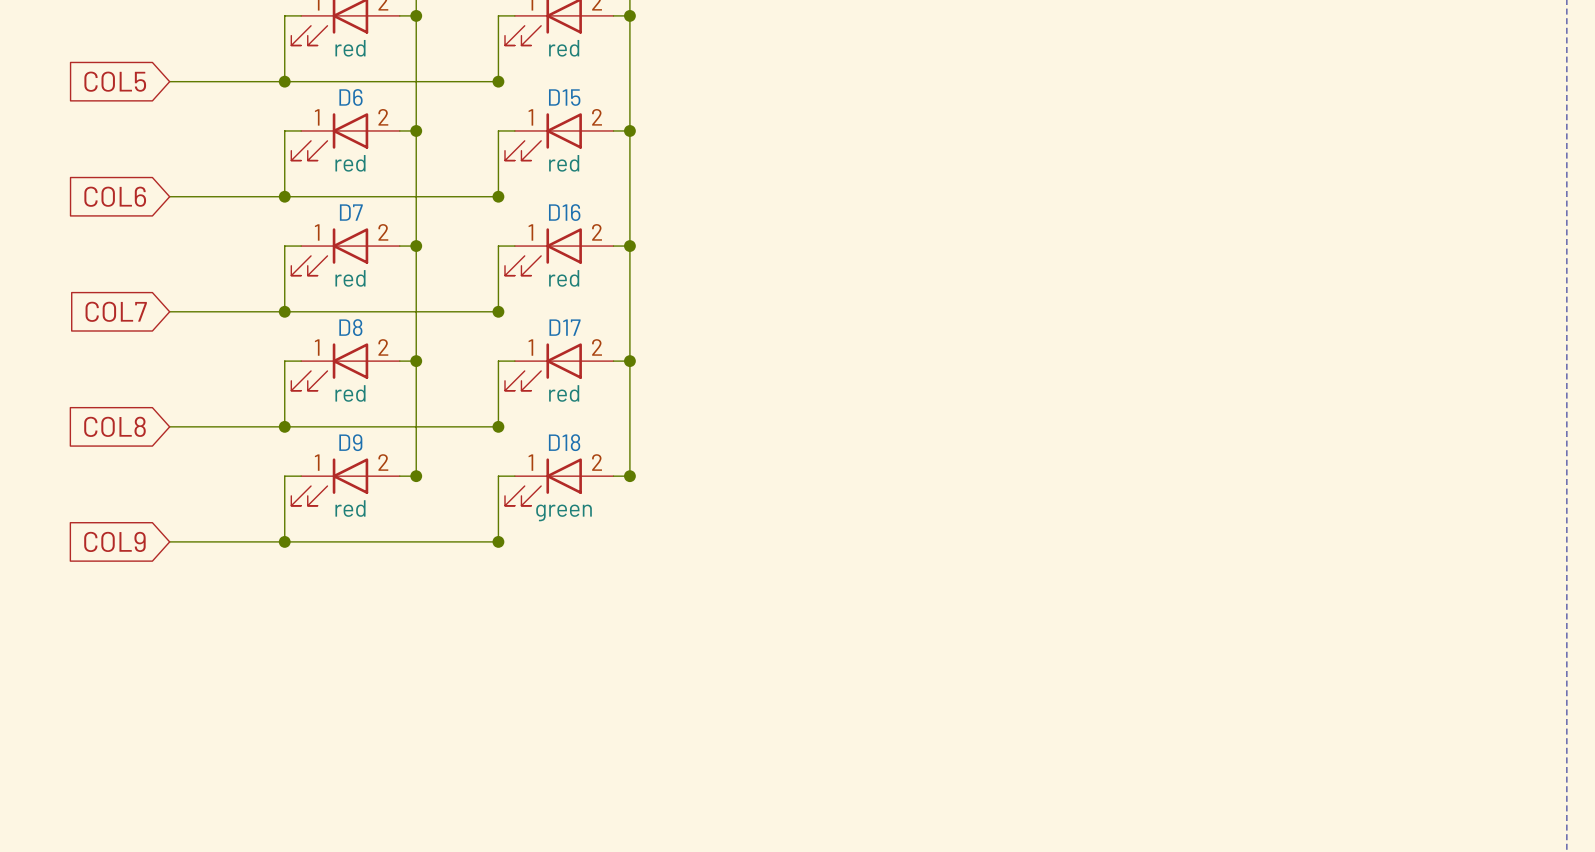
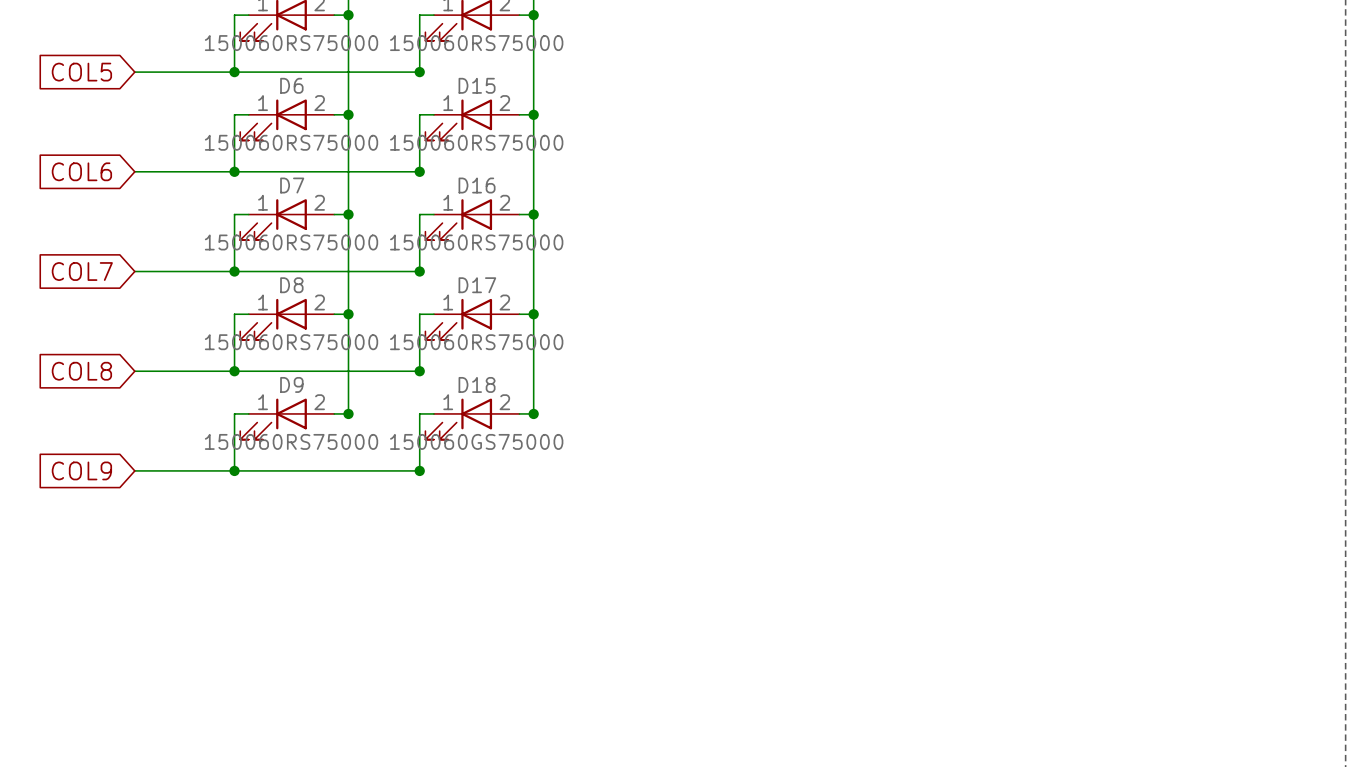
part value: red (350, 48) -> 150060RS75000 (291, 43)
part value: red (564, 48) -> 150060RS75000 (476, 43)
D6 value: red (350, 163) -> 150060RS75000 (291, 142)
D15 value: red (564, 163) -> 150060RS75000 (476, 142)
D7 value: red (350, 278) -> 150060RS75000 (291, 242)
D16 value: red (564, 278) -> 150060RS75000 (476, 242)
D8 value: red (350, 393) -> 150060RS75000 (291, 342)
D17 value: red (564, 393) -> 150060RS75000 (476, 342)
D9 value: red (350, 508) -> 150060RS75000 (291, 441)
D18 value: green (564, 512) -> 150060GS75000 (476, 441)

